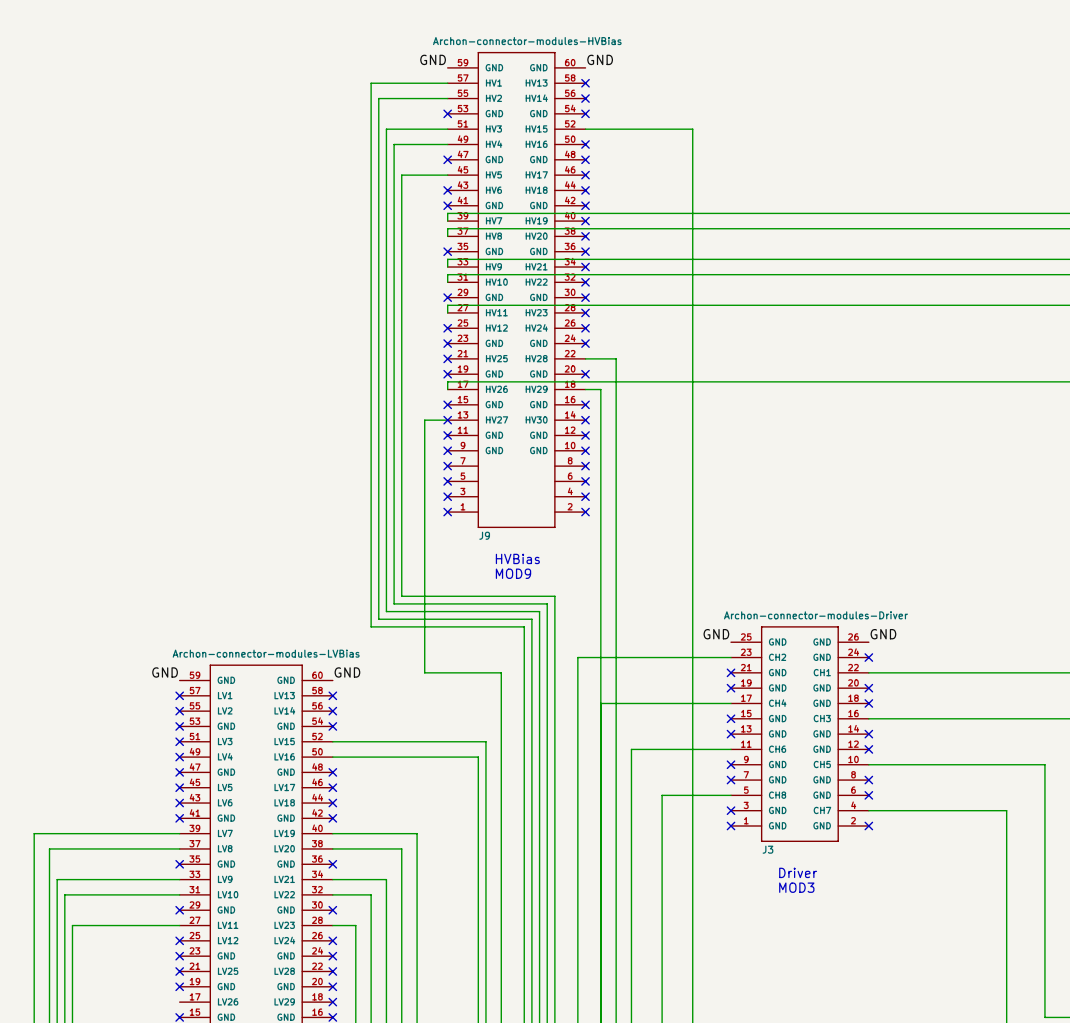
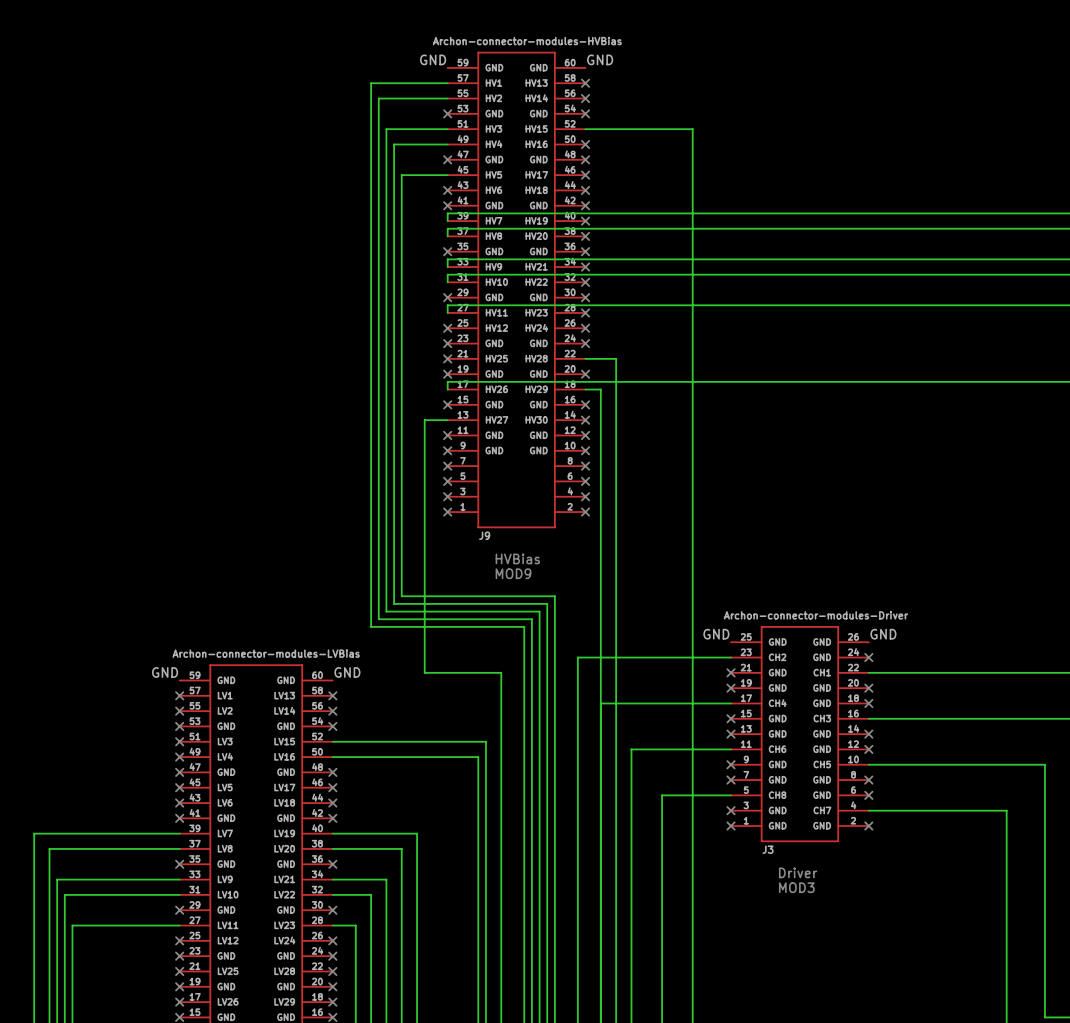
no-connect mark: (447, 420) -> none
no-connect mark: none -> (179, 1002)

